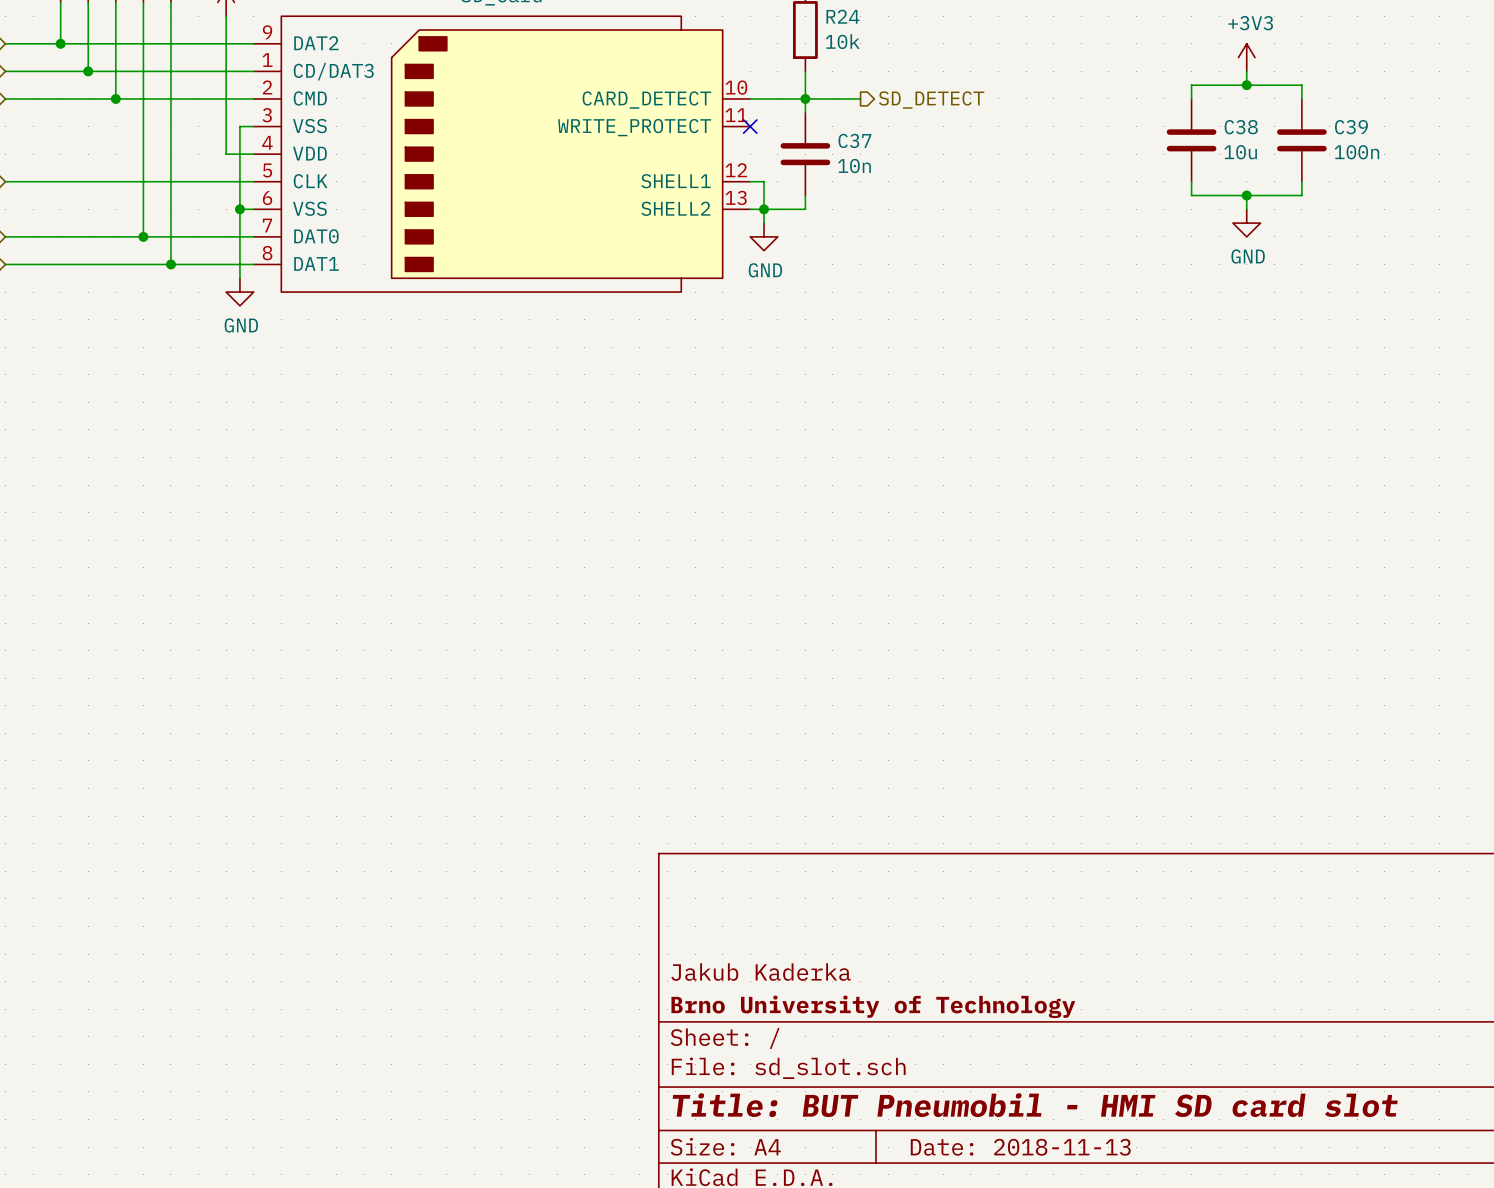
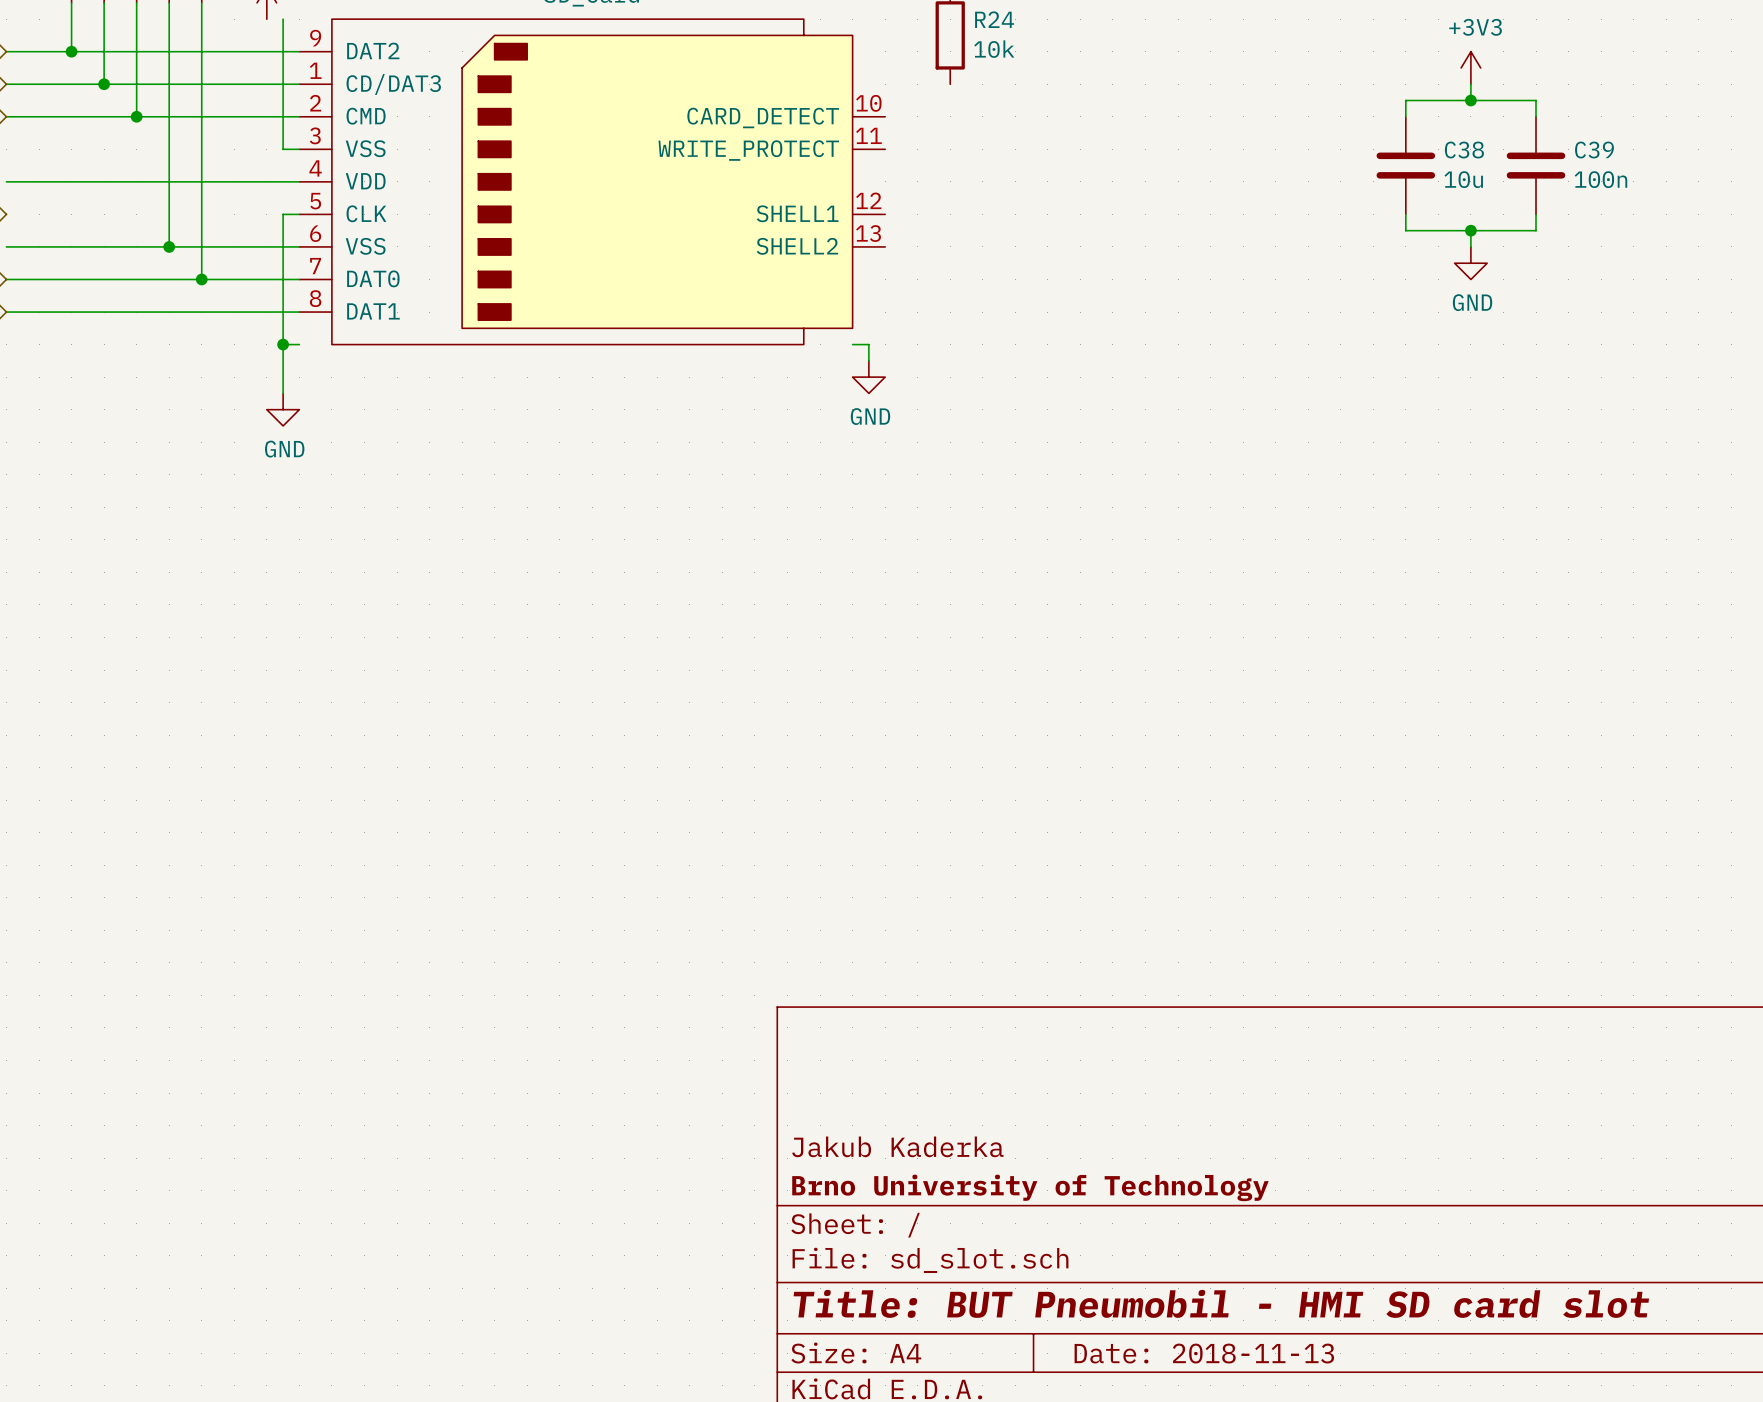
wire: (226, 16) (226, 154) -> (6, 181) (266, 181)
wire: (805, 71) (805, 112) -> none
wire: (750, 98) (860, 98) -> none
junction: (805, 98) -> none
hierarchical label: SD_DETECT (931, 100) -> none
wire: (239, 126) (239, 181) (5, 181) -> (283, 149) (283, 19)
no-connect mark: (750, 126) -> none
C37: 10n (805, 154) -> none
wire: (750, 181) (764, 181) (764, 223) -> none
wire: (805, 195) (805, 209) (750, 209) -> none
wire: none -> (6, 246) (283, 246)
wire: (143, 209) (143, 236) -> none
junction: none -> (169, 246)
junction: (239, 209) -> none
junction: (764, 209) -> none
junction: (143, 236) -> none
wire: (170, 236) (170, 264) -> none
junction: none -> (201, 279)
power symbol position: GND (764, 236) -> GND (868, 377)
junction: (170, 264) -> none
wire: none -> (283, 328) (283, 393)
junction: none -> (283, 344)
power symbol position: GND (239, 292) -> GND (283, 409)
wire: none -> (852, 344) (868, 344) (868, 360)

